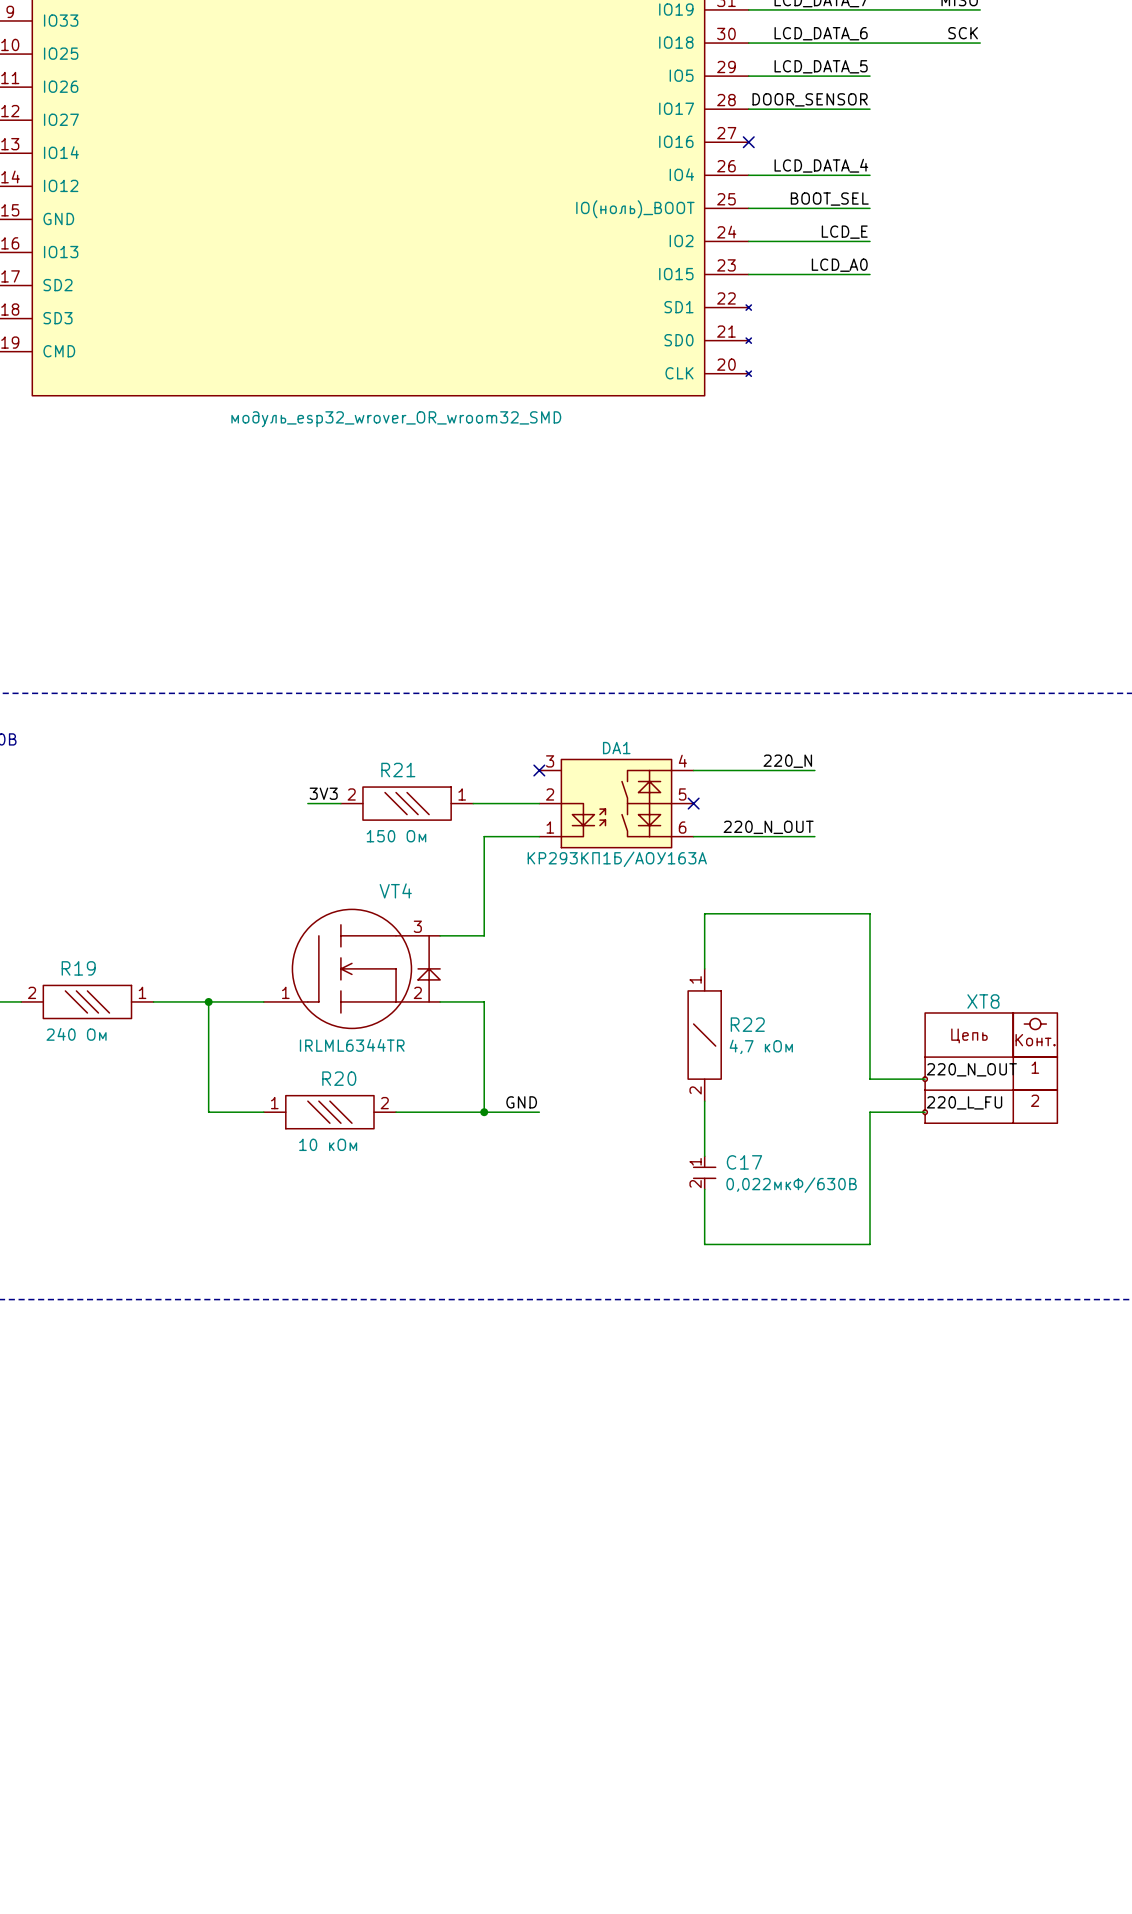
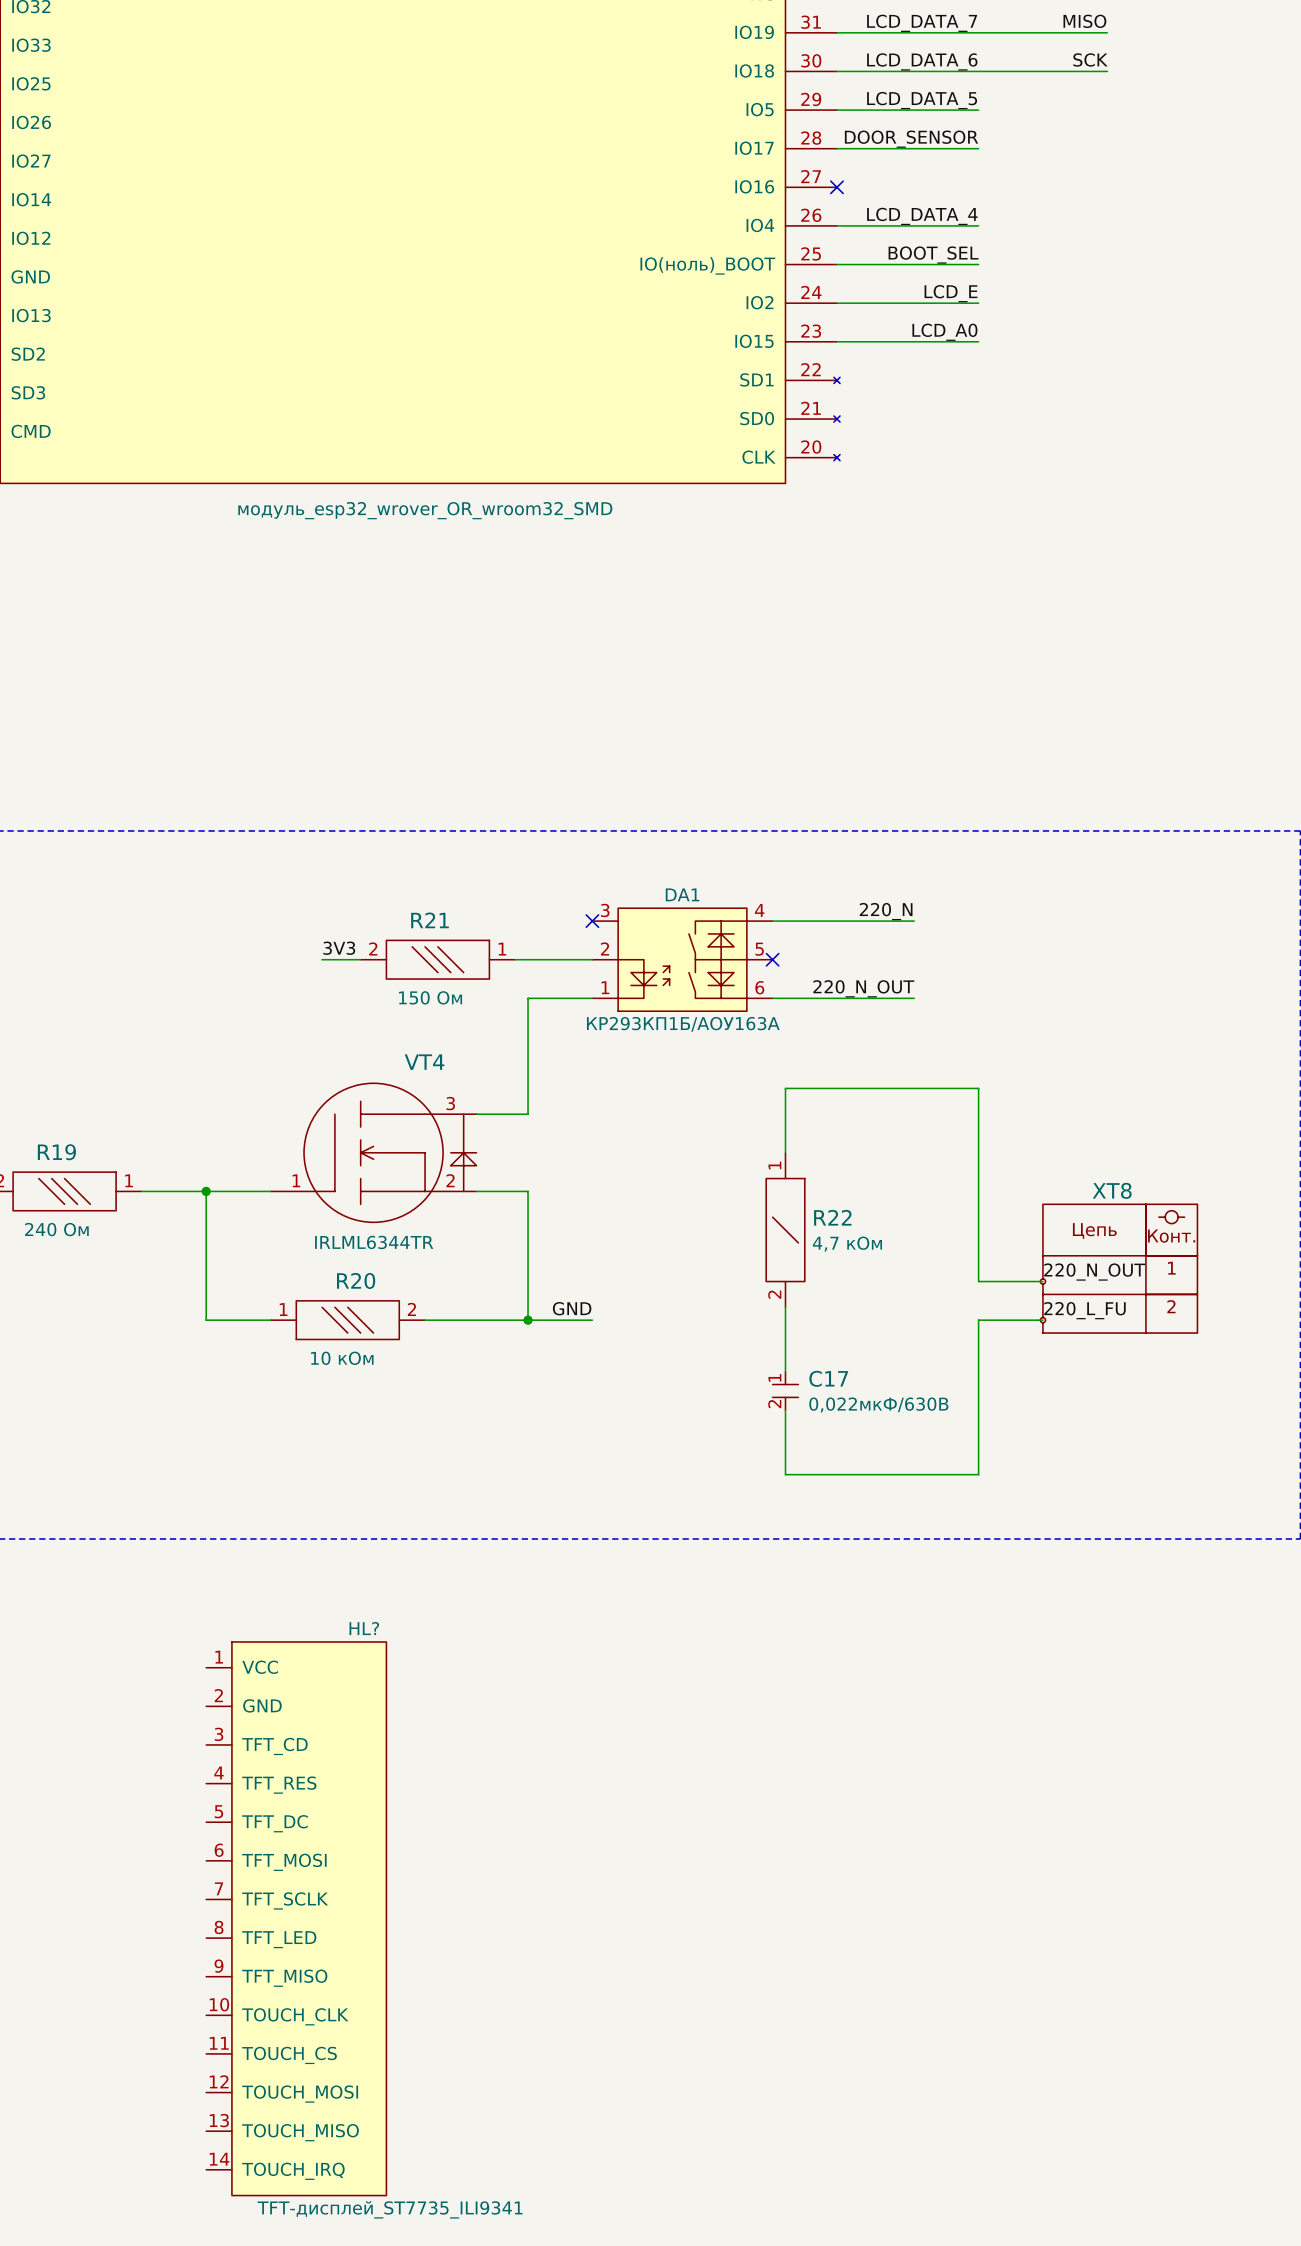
HL?: none -> TFT-дисплей_ST7735_ILI9341 (296, 1918)

